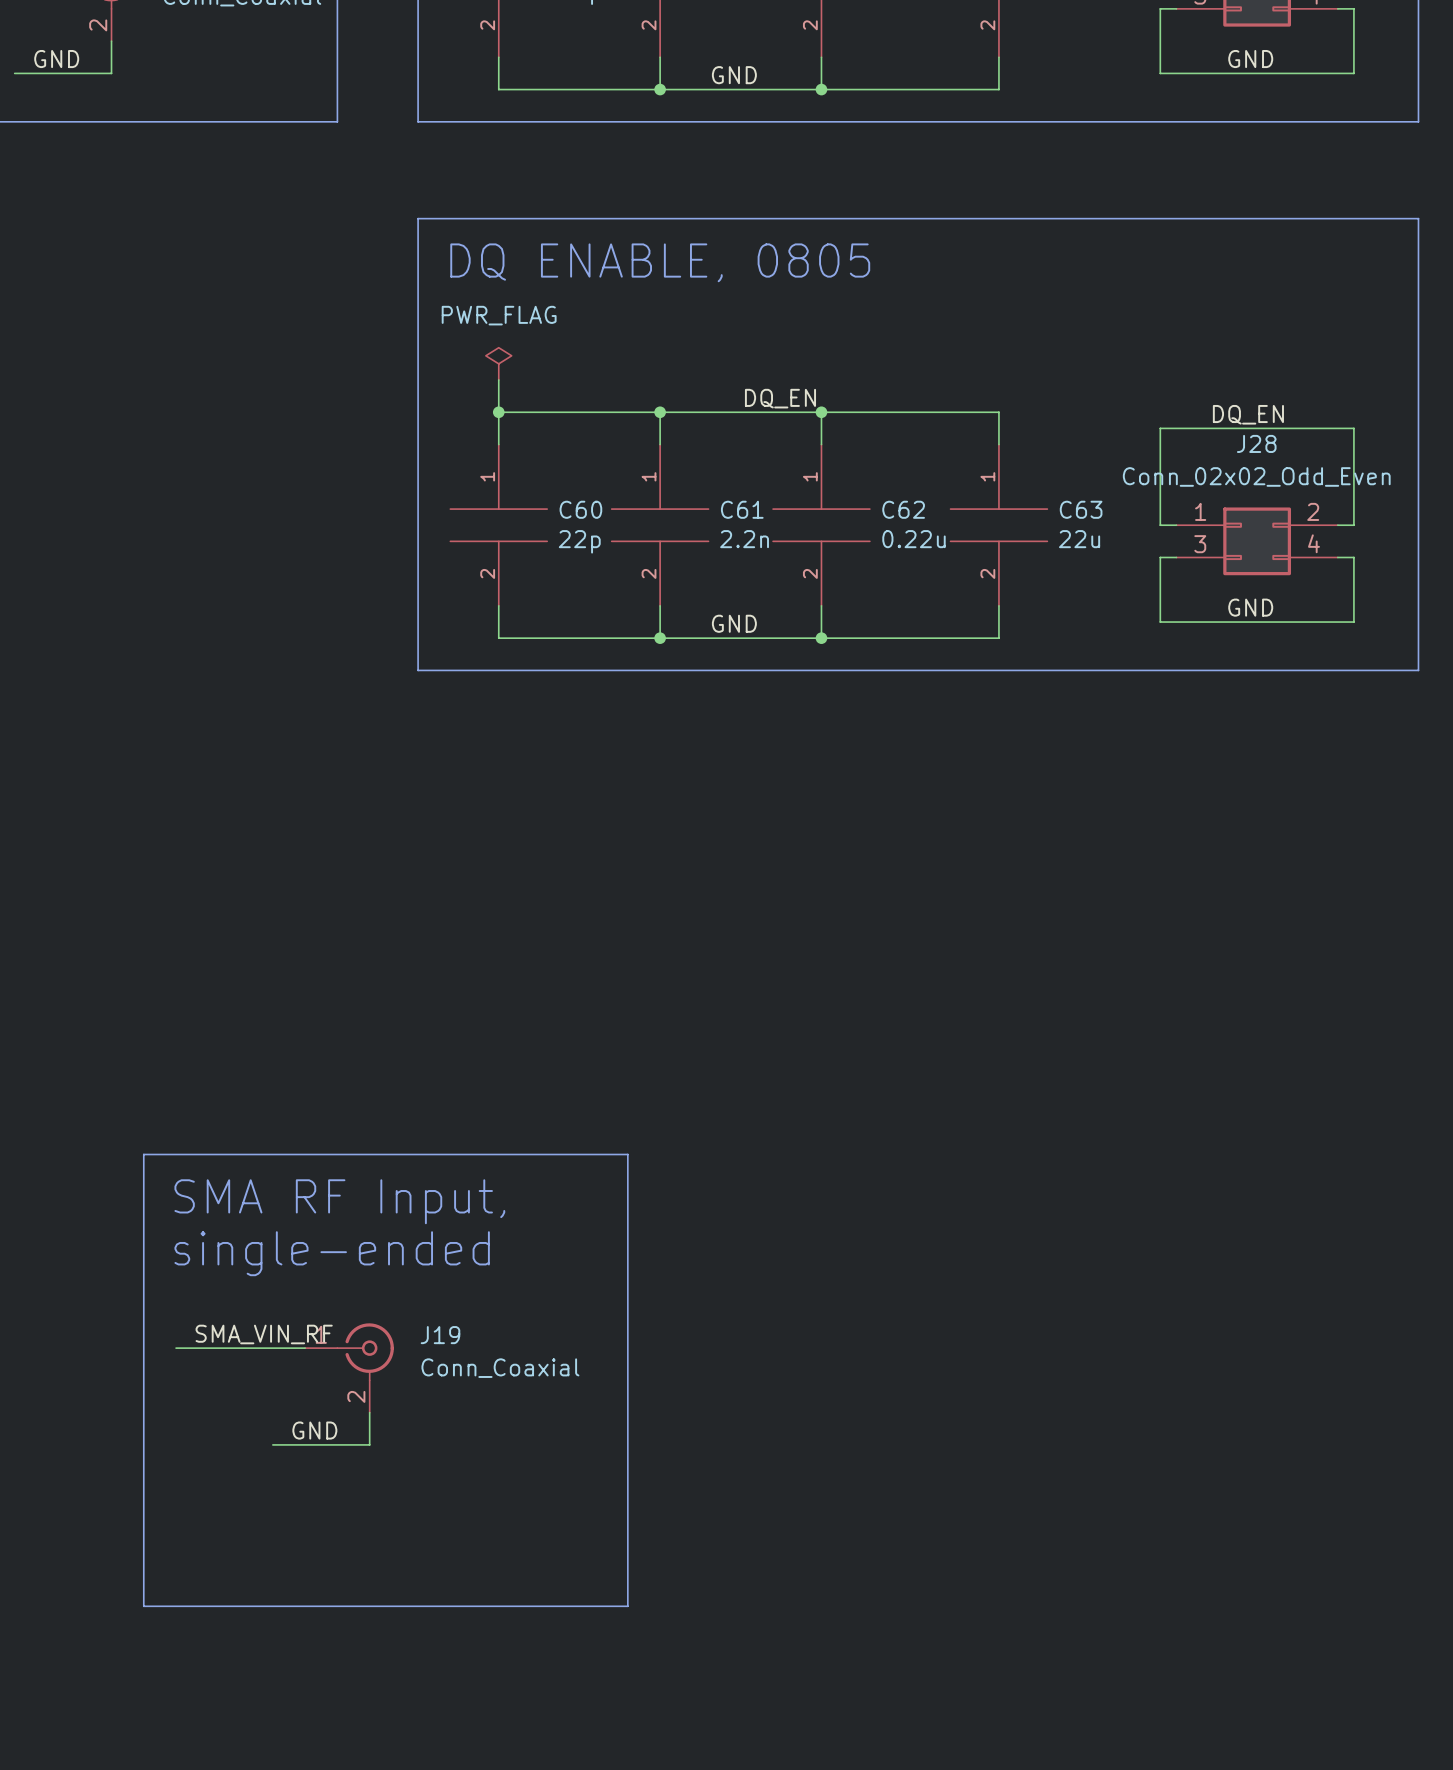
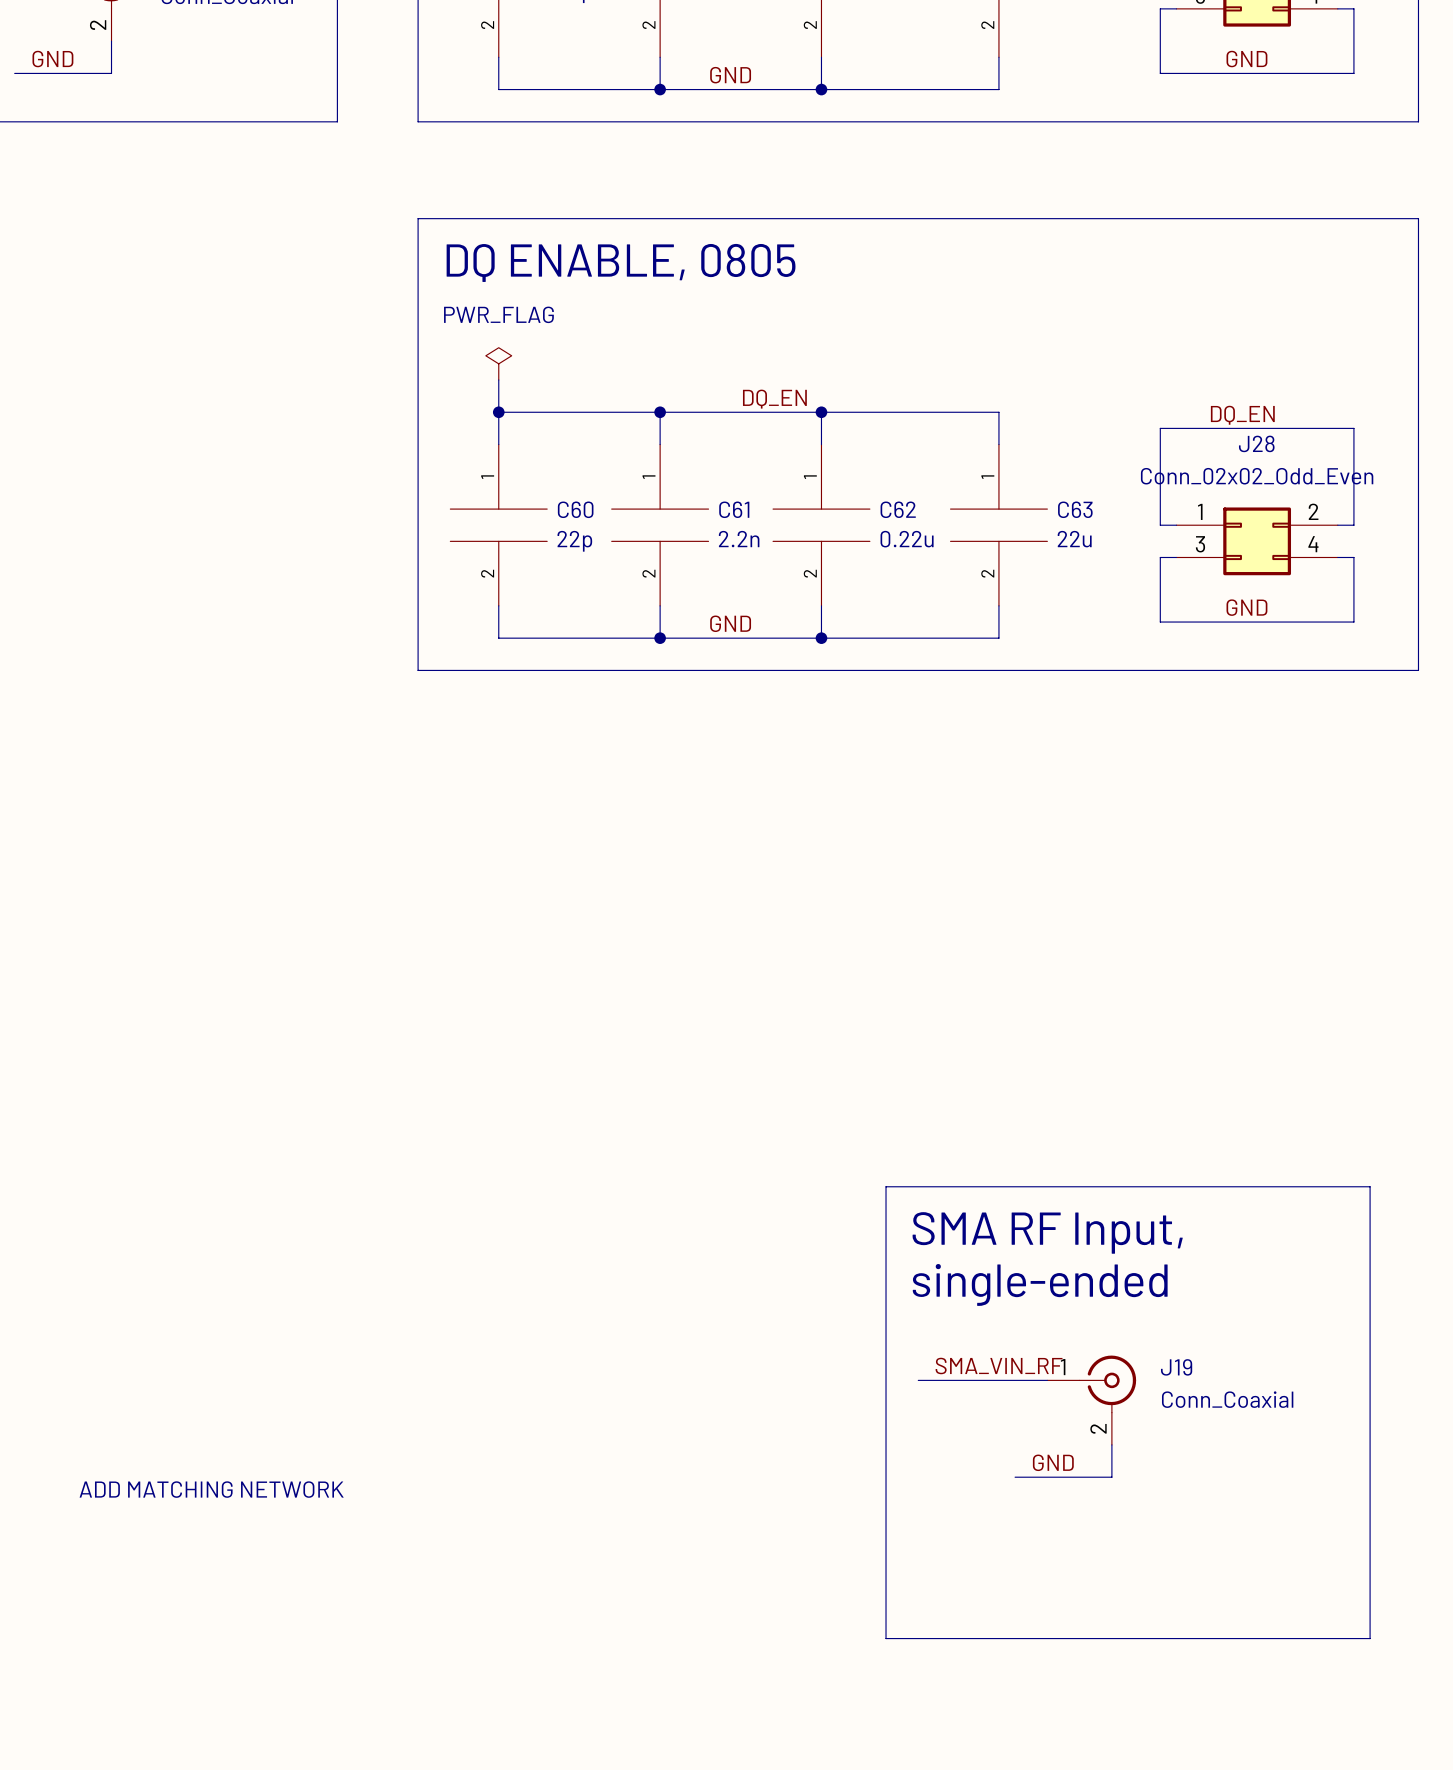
line: (143, 1154) (627, 1154) (627, 1606) (143, 1606) (143, 1154) -> none
line: none -> (886, 1186) (1370, 1186) (1370, 1638) (886, 1638) (886, 1186)
text: SMA RF Input, (339, 1201) -> none
text: none -> SMA RF Input, (1047, 1232)
text: single-ended (332, 1253) -> none
text: none -> single-ended (1040, 1284)
label: SMA_VIN_RF (264, 1334) -> none
wire: (176, 1348) (305, 1348) -> none
label: none -> SMA_VIN_RF (999, 1365)
J19 position: (349, 1367) -> (1091, 1400)
wire: none -> (918, 1380) (1047, 1380)
wire: (369, 1412) (369, 1444) (272, 1444) -> none
label: GND (314, 1430) -> none
wire: none -> (1111, 1444) (1111, 1477) (1015, 1477)
label: none -> GND (1053, 1462)
text: none -> ADD MATCHING NETWORK (211, 1489)

